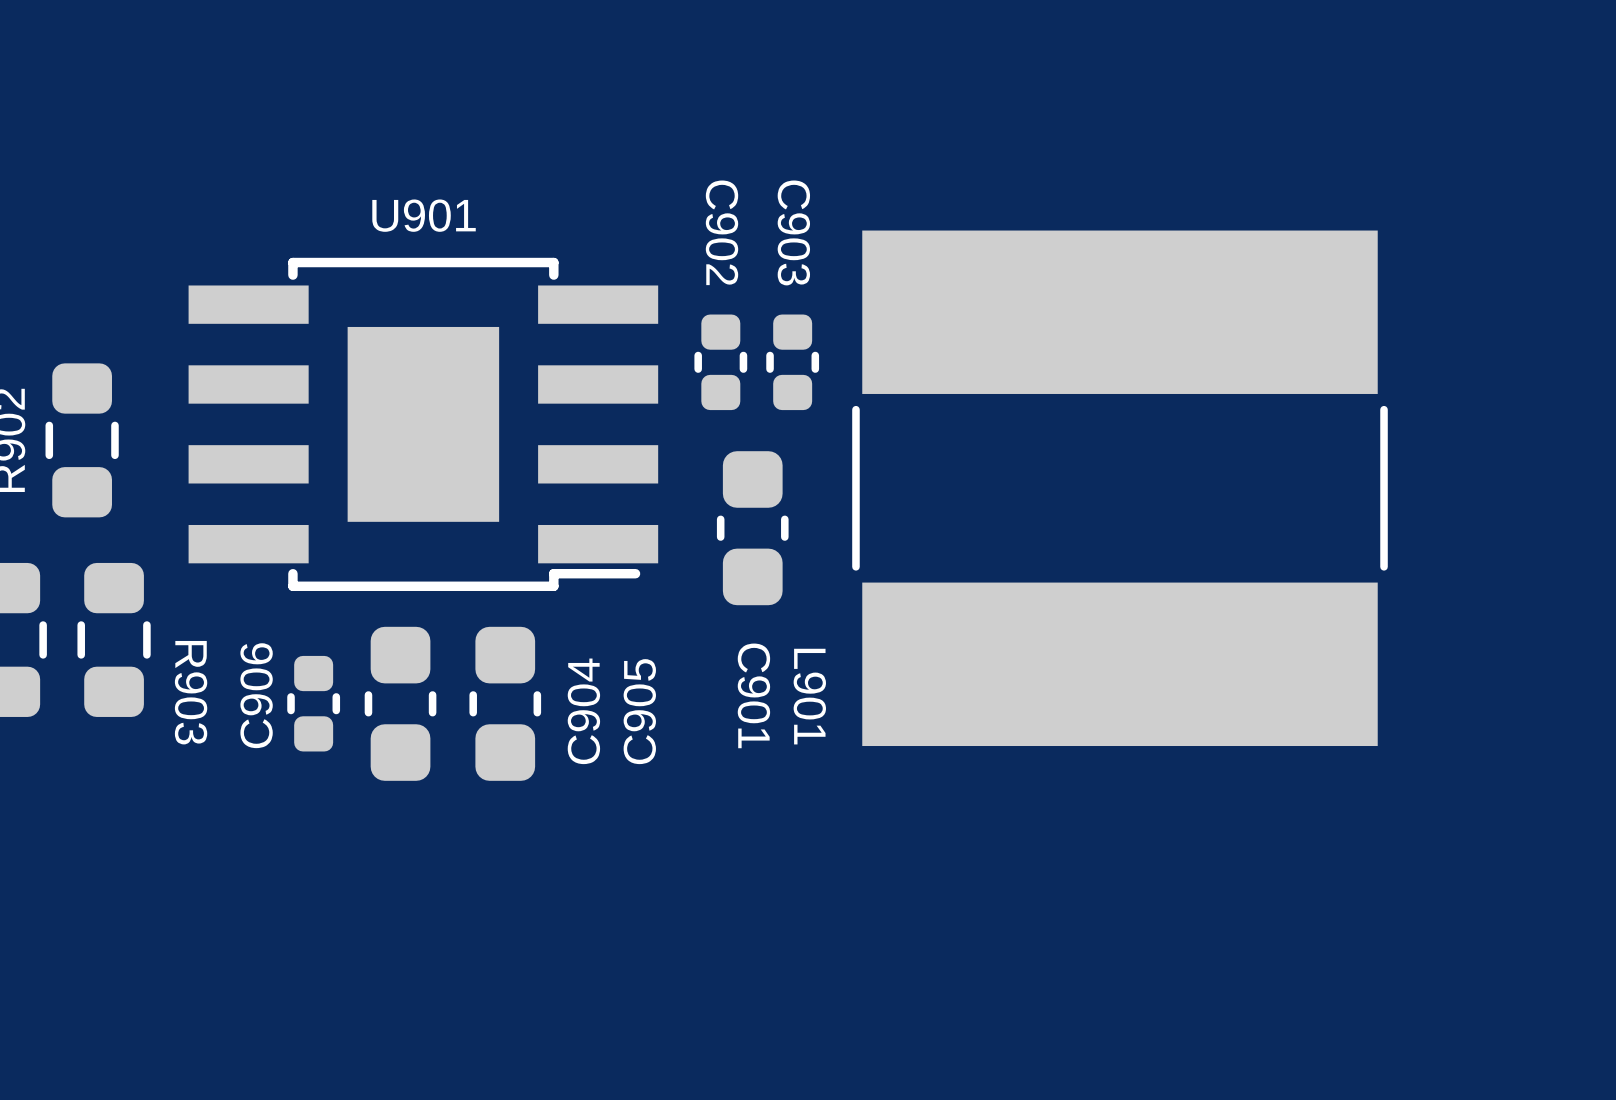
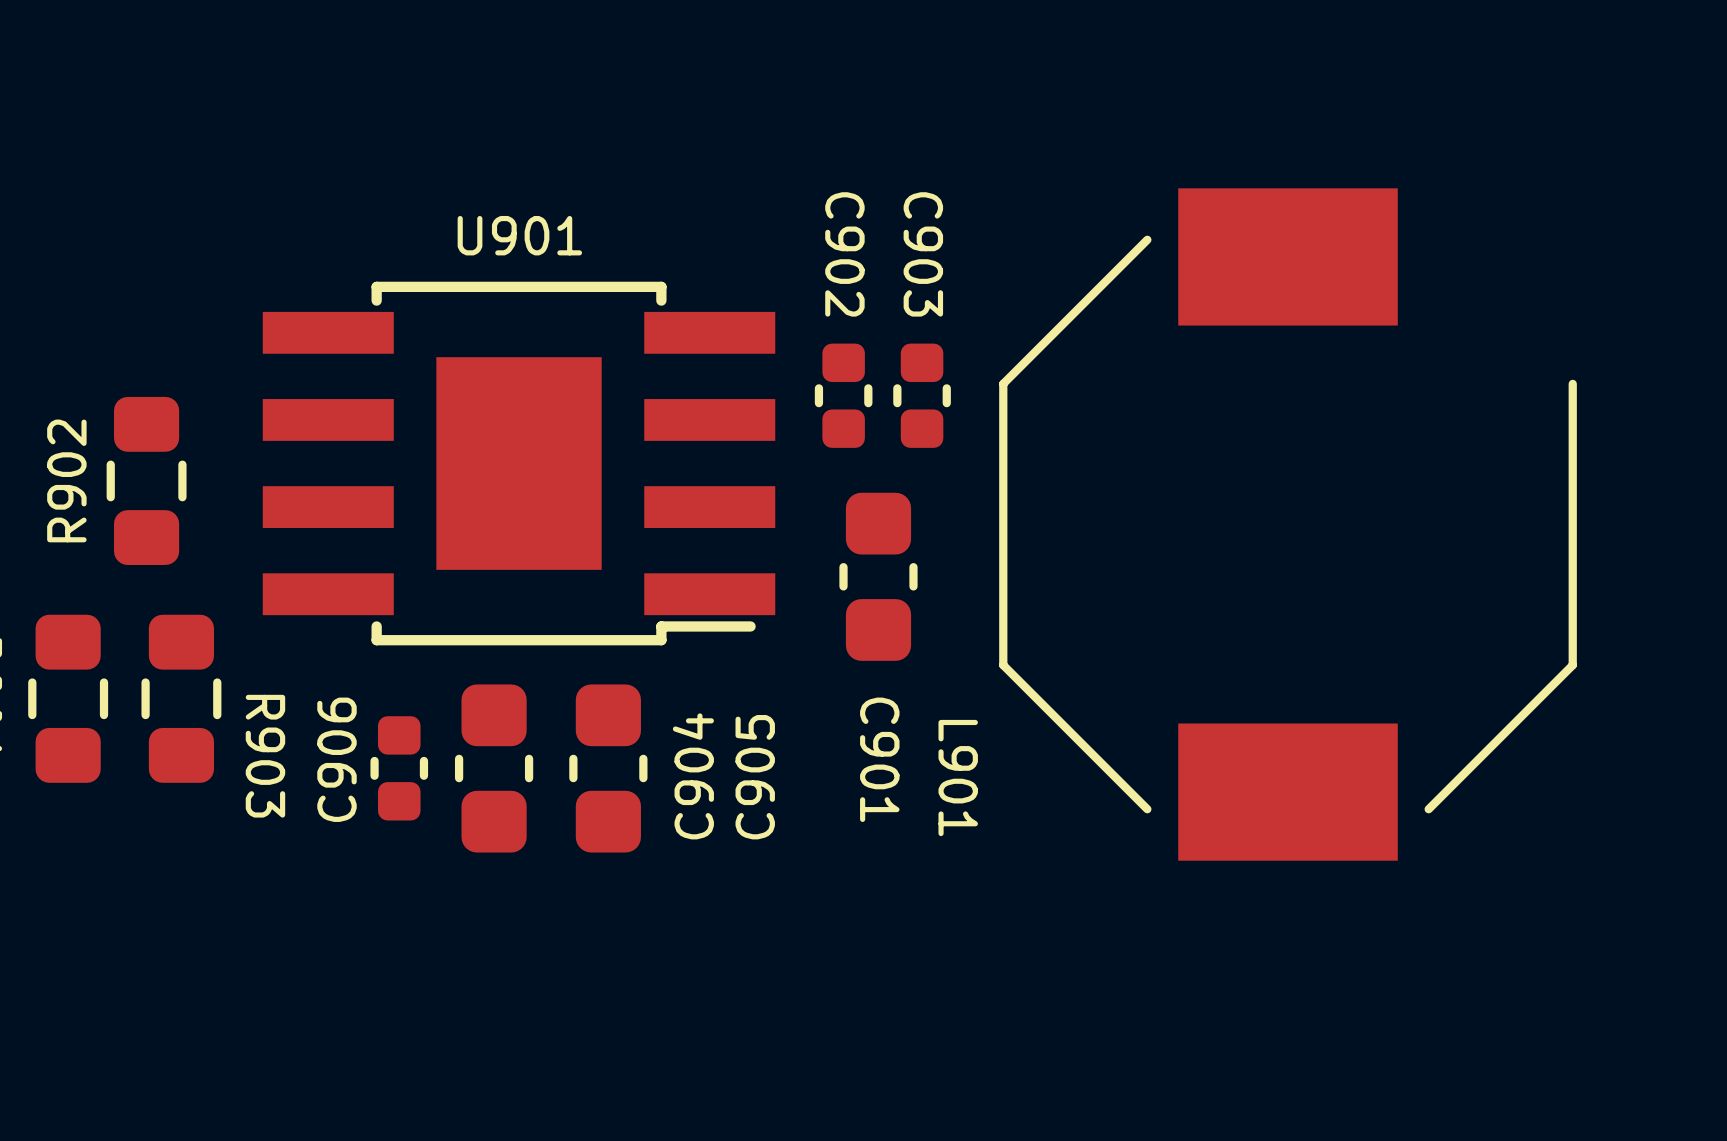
L901 footprint: [852, 230, 1388, 747] -> [999, 188, 1577, 861]

